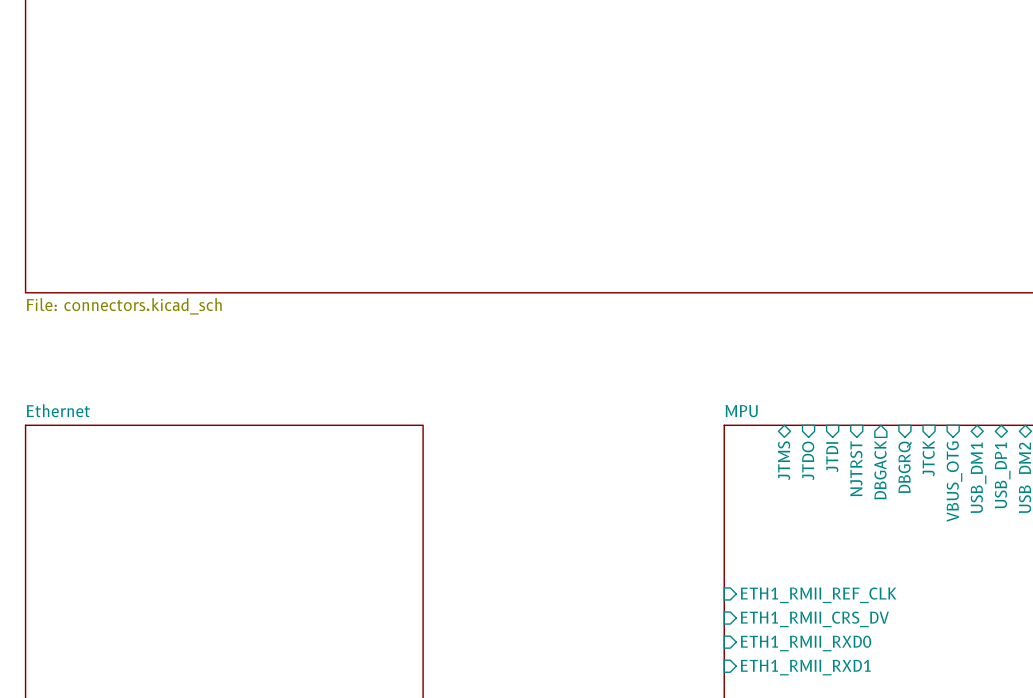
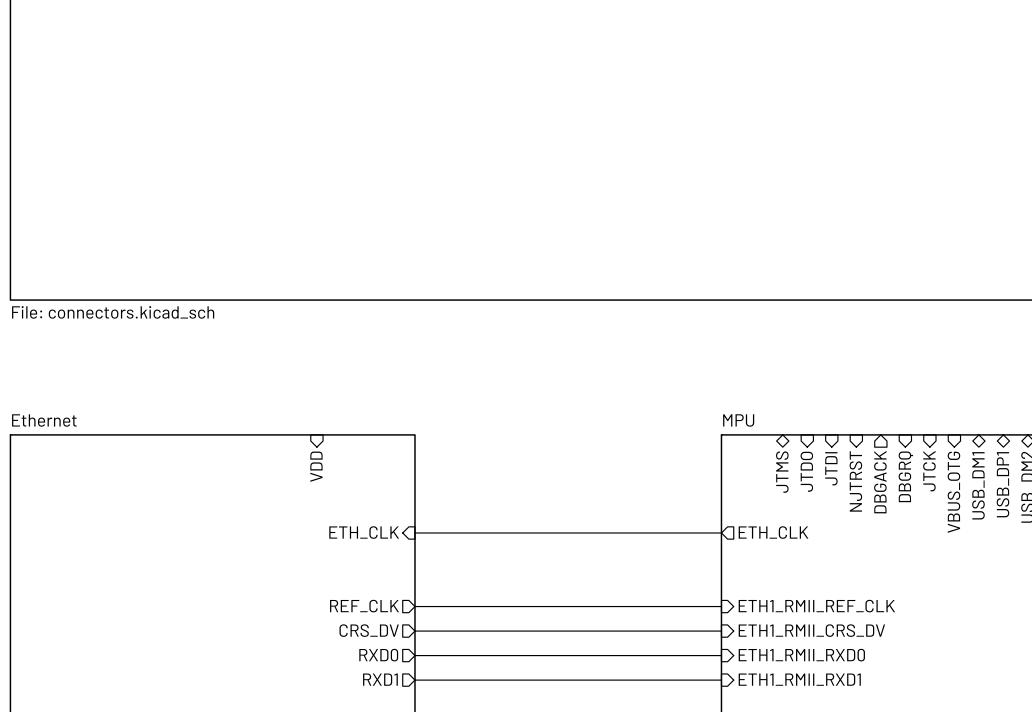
sheet pin: none -> VDD (316, 466)
wire: none -> (414, 532) (721, 532)
sheet pin: none -> ETH_CLK (364, 532)
sheet pin: none -> ETH_CLK (773, 532)
wire: none -> (414, 606) (721, 606)
sheet pin: none -> REF_CLK (364, 606)
wire: none -> (414, 631) (721, 631)
sheet pin: none -> CRS_DV (369, 630)
sheet pin: none -> RXD0 (378, 655)
wire: none -> (414, 655) (721, 655)
sheet pin: none -> RXD1 (380, 679)
wire: none -> (414, 680) (721, 680)

